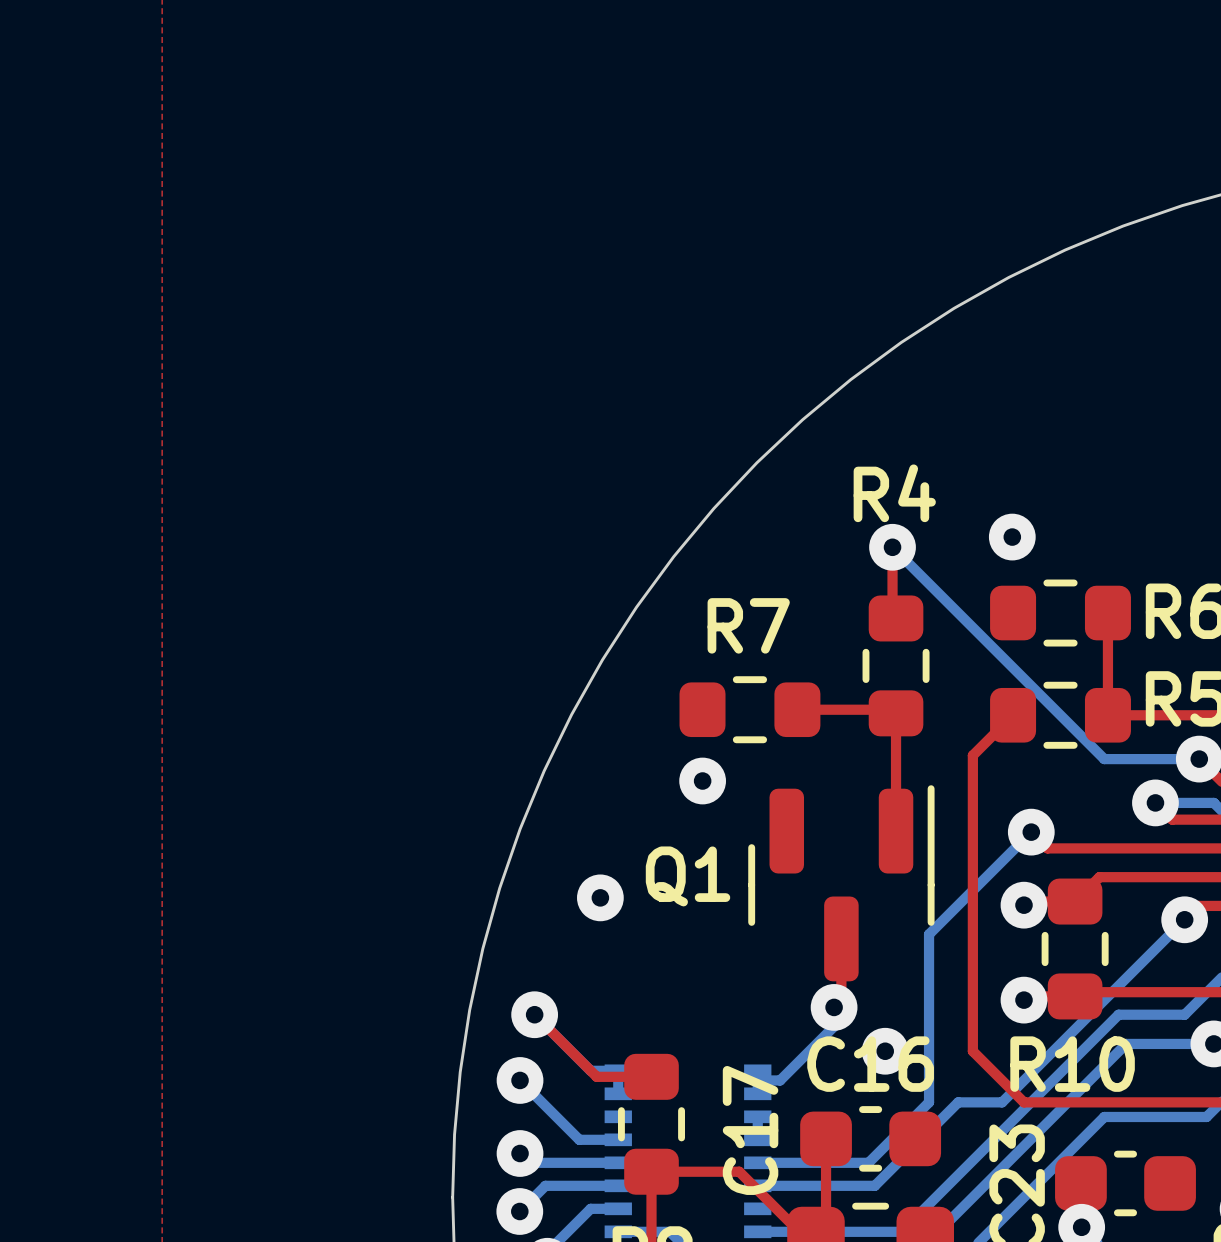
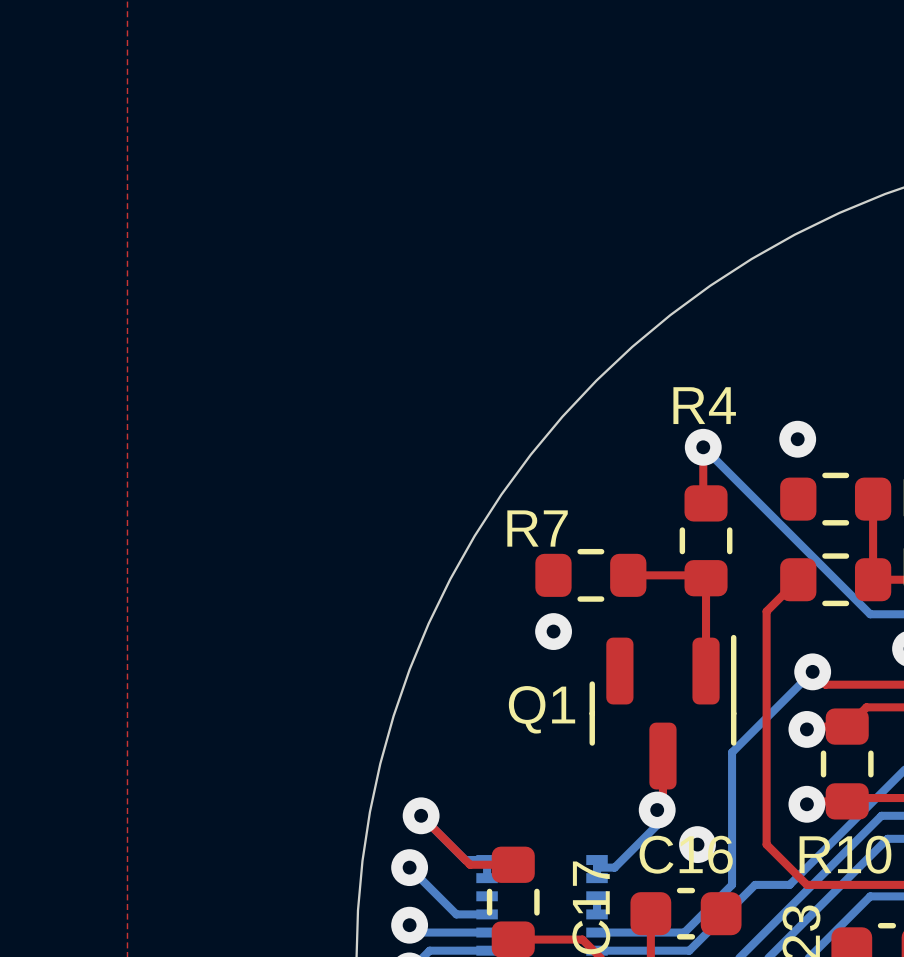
R7 name position: R7 (748, 625) -> R7 (537, 528)
via: (600, 897) -> none

